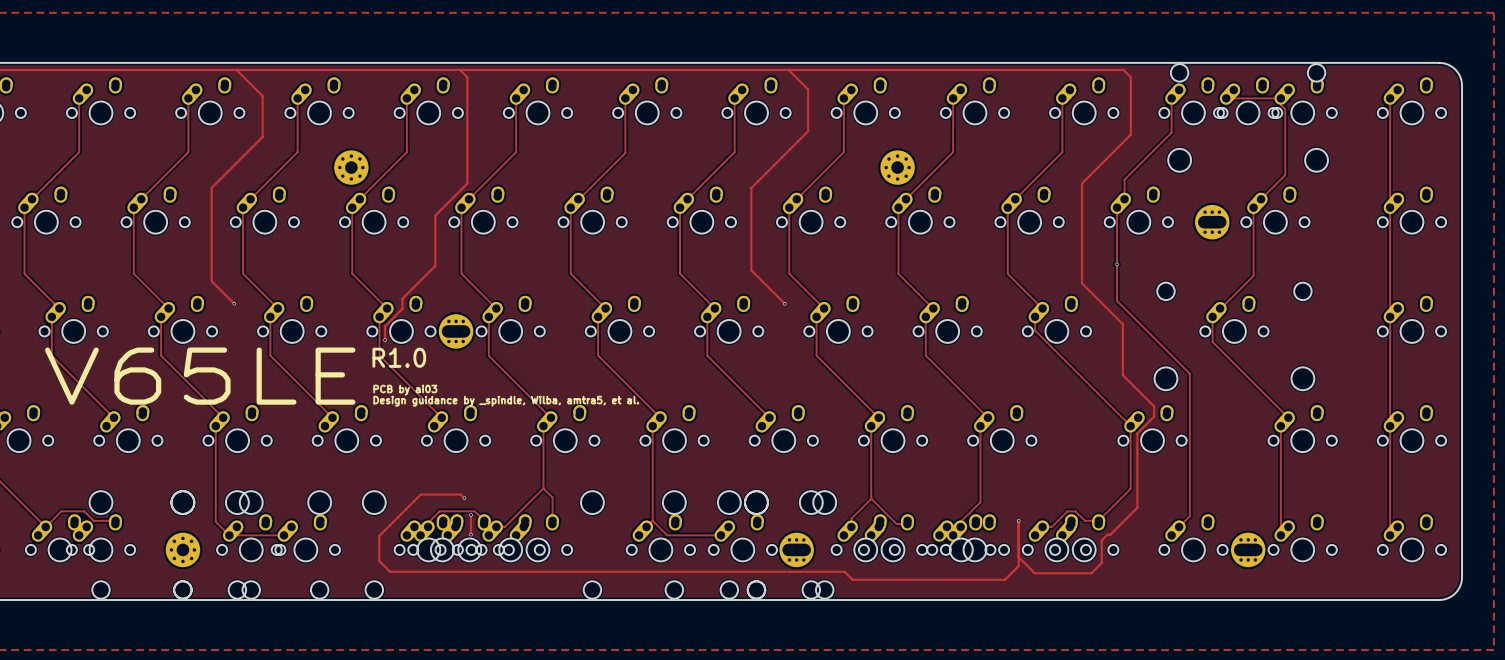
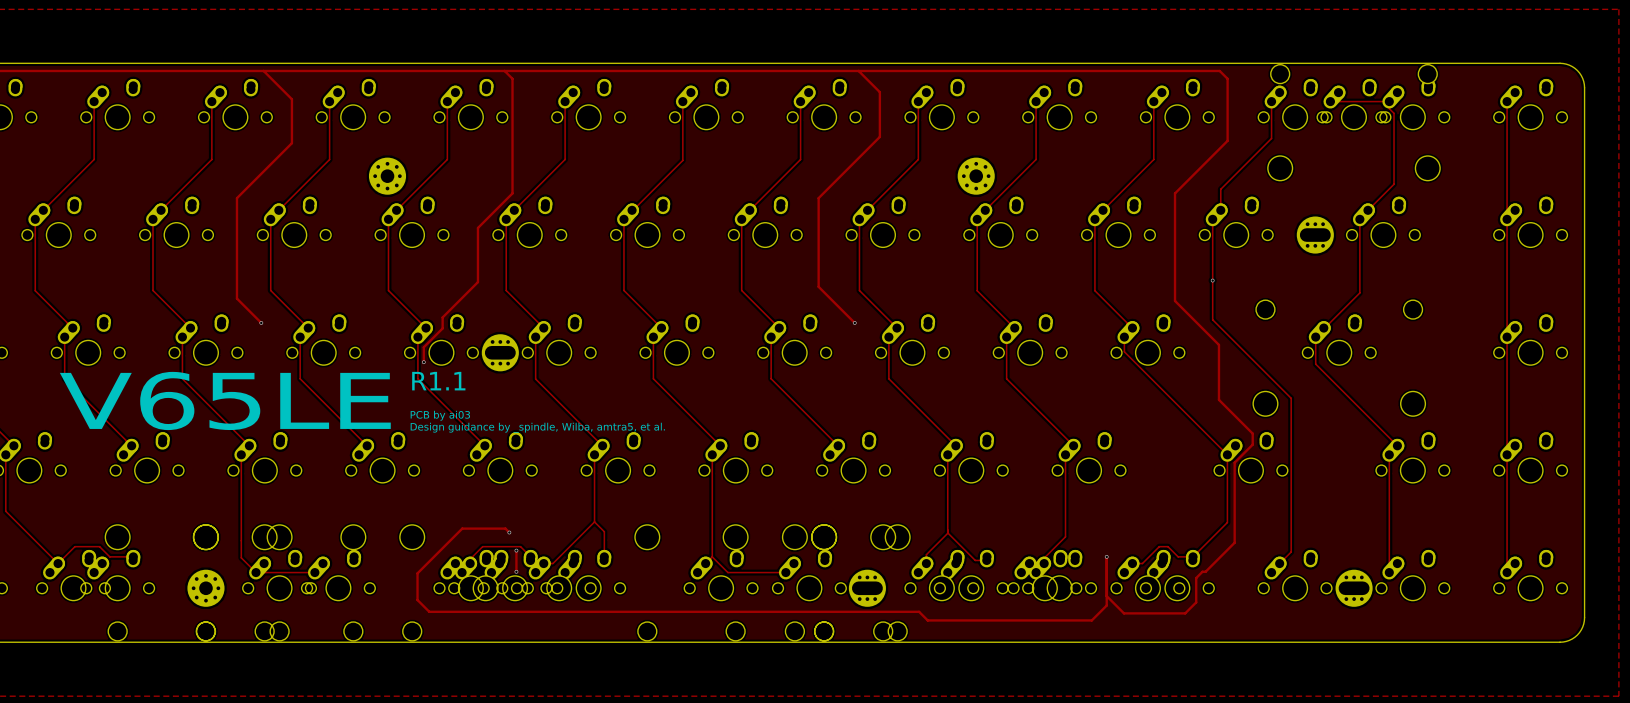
text: R1.0 (399, 357) -> R1.1 (438, 381)

